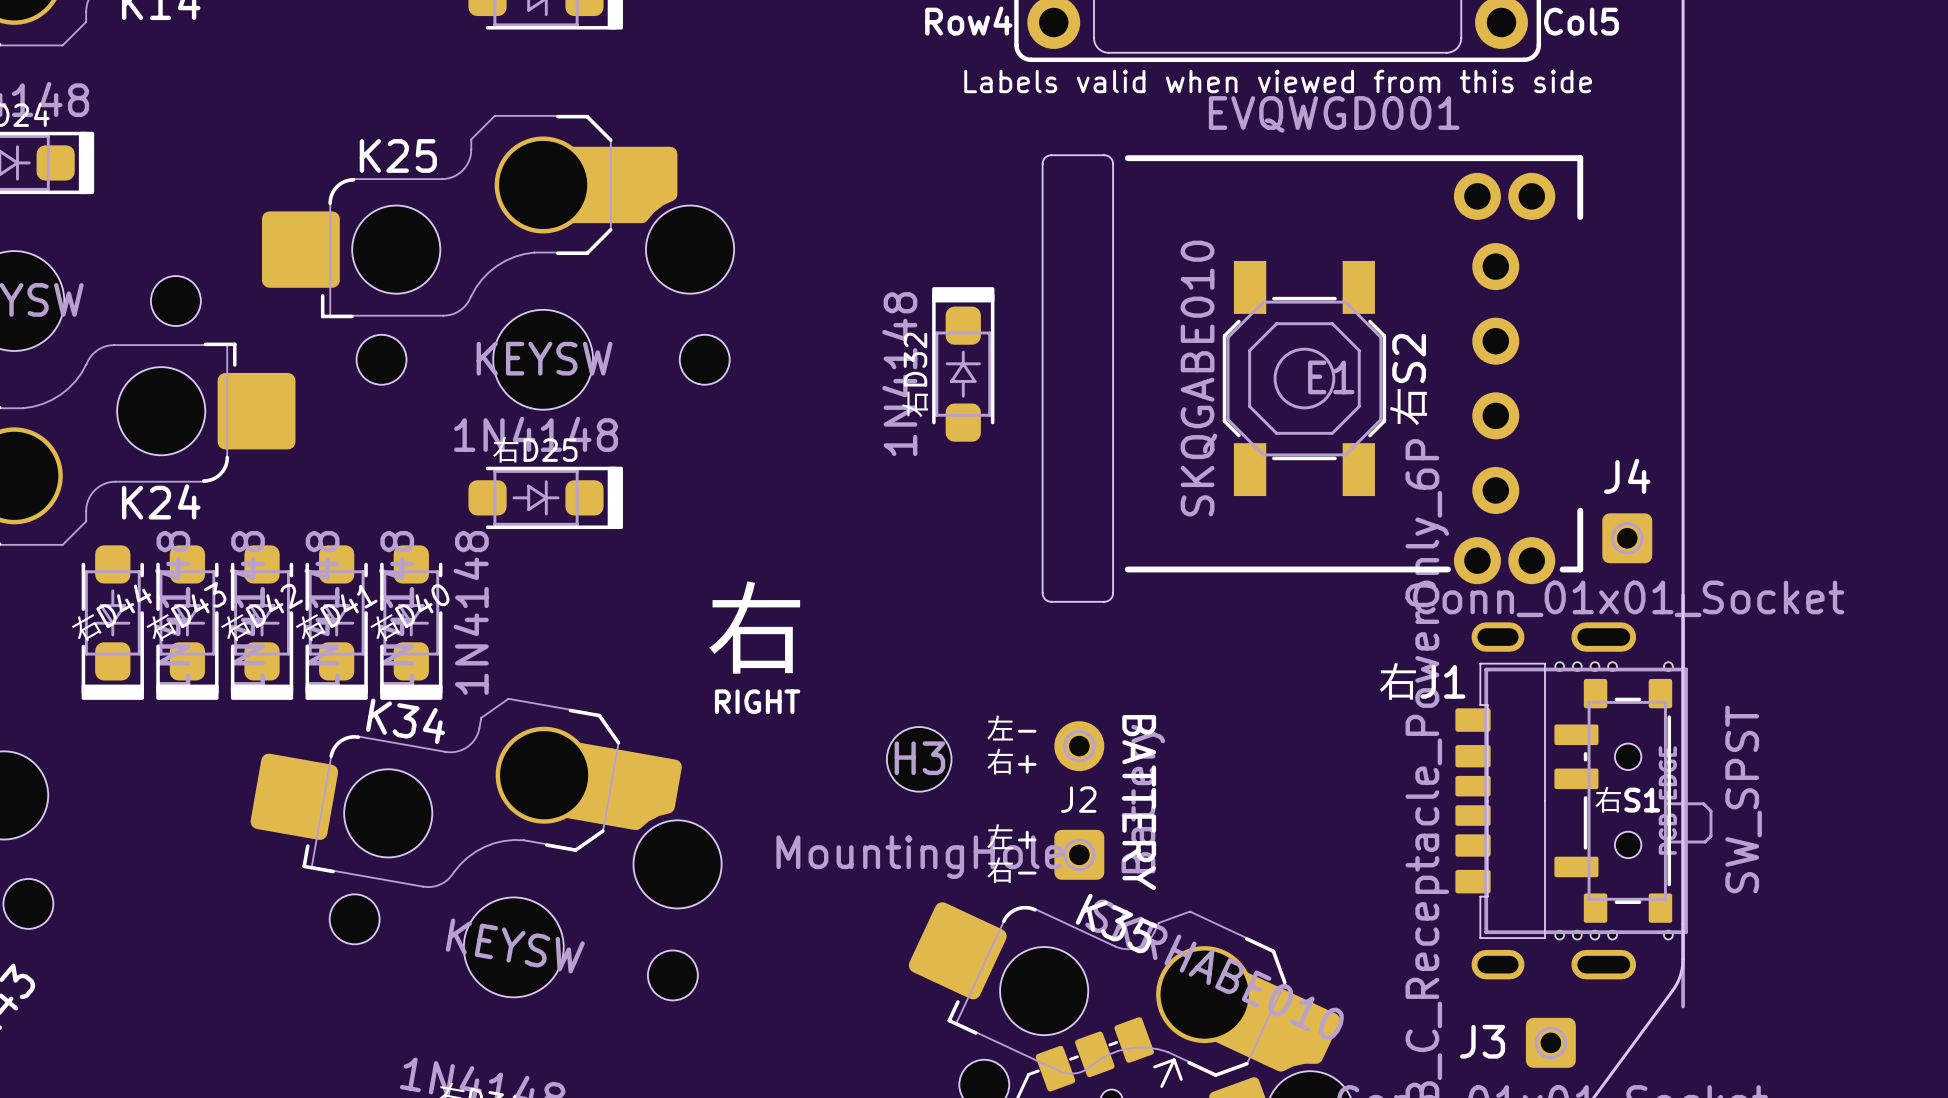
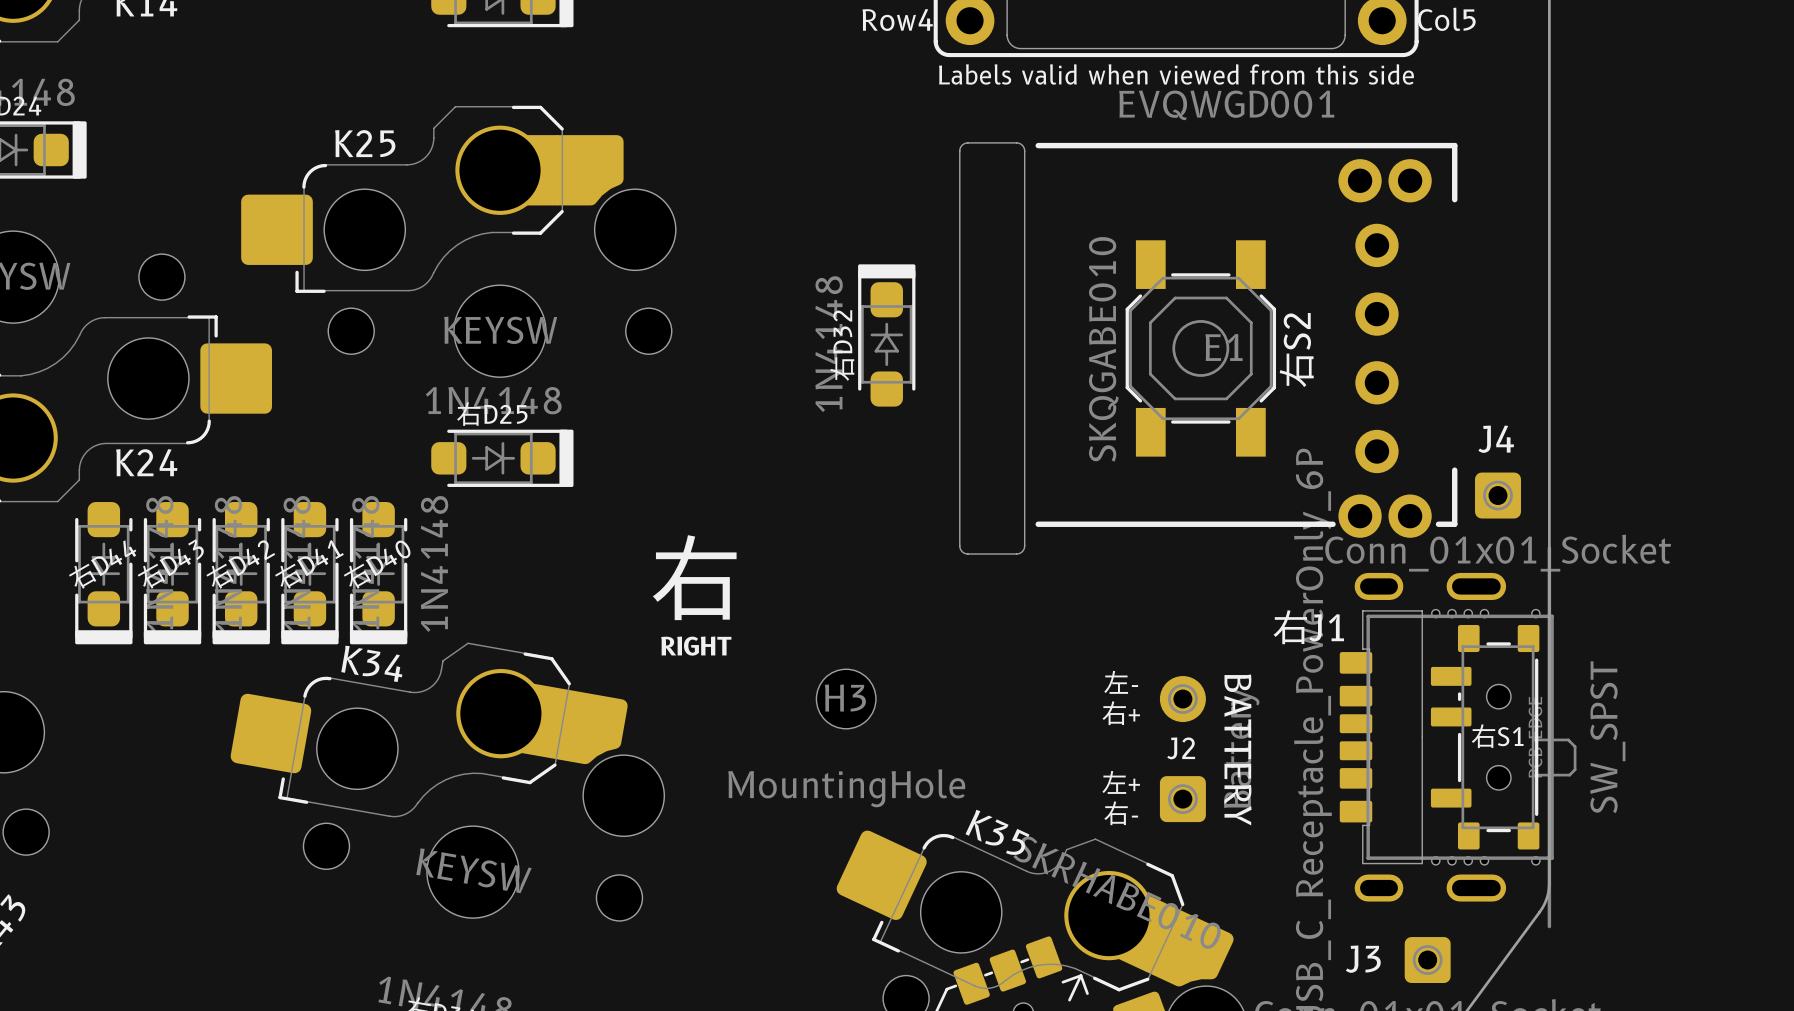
text position: 左- (1011, 728) -> 左- (1121, 682)
text position: 右+ (1011, 761) -> 右+ (1121, 713)
J2 position: (1079, 800) -> (1182, 749)
text position: 左+ (1011, 836) -> 左+ (1121, 782)
text position: 右- (1011, 870) -> 右- (1121, 813)
K35 name position: K35 (1116, 923) -> K35 (997, 832)

